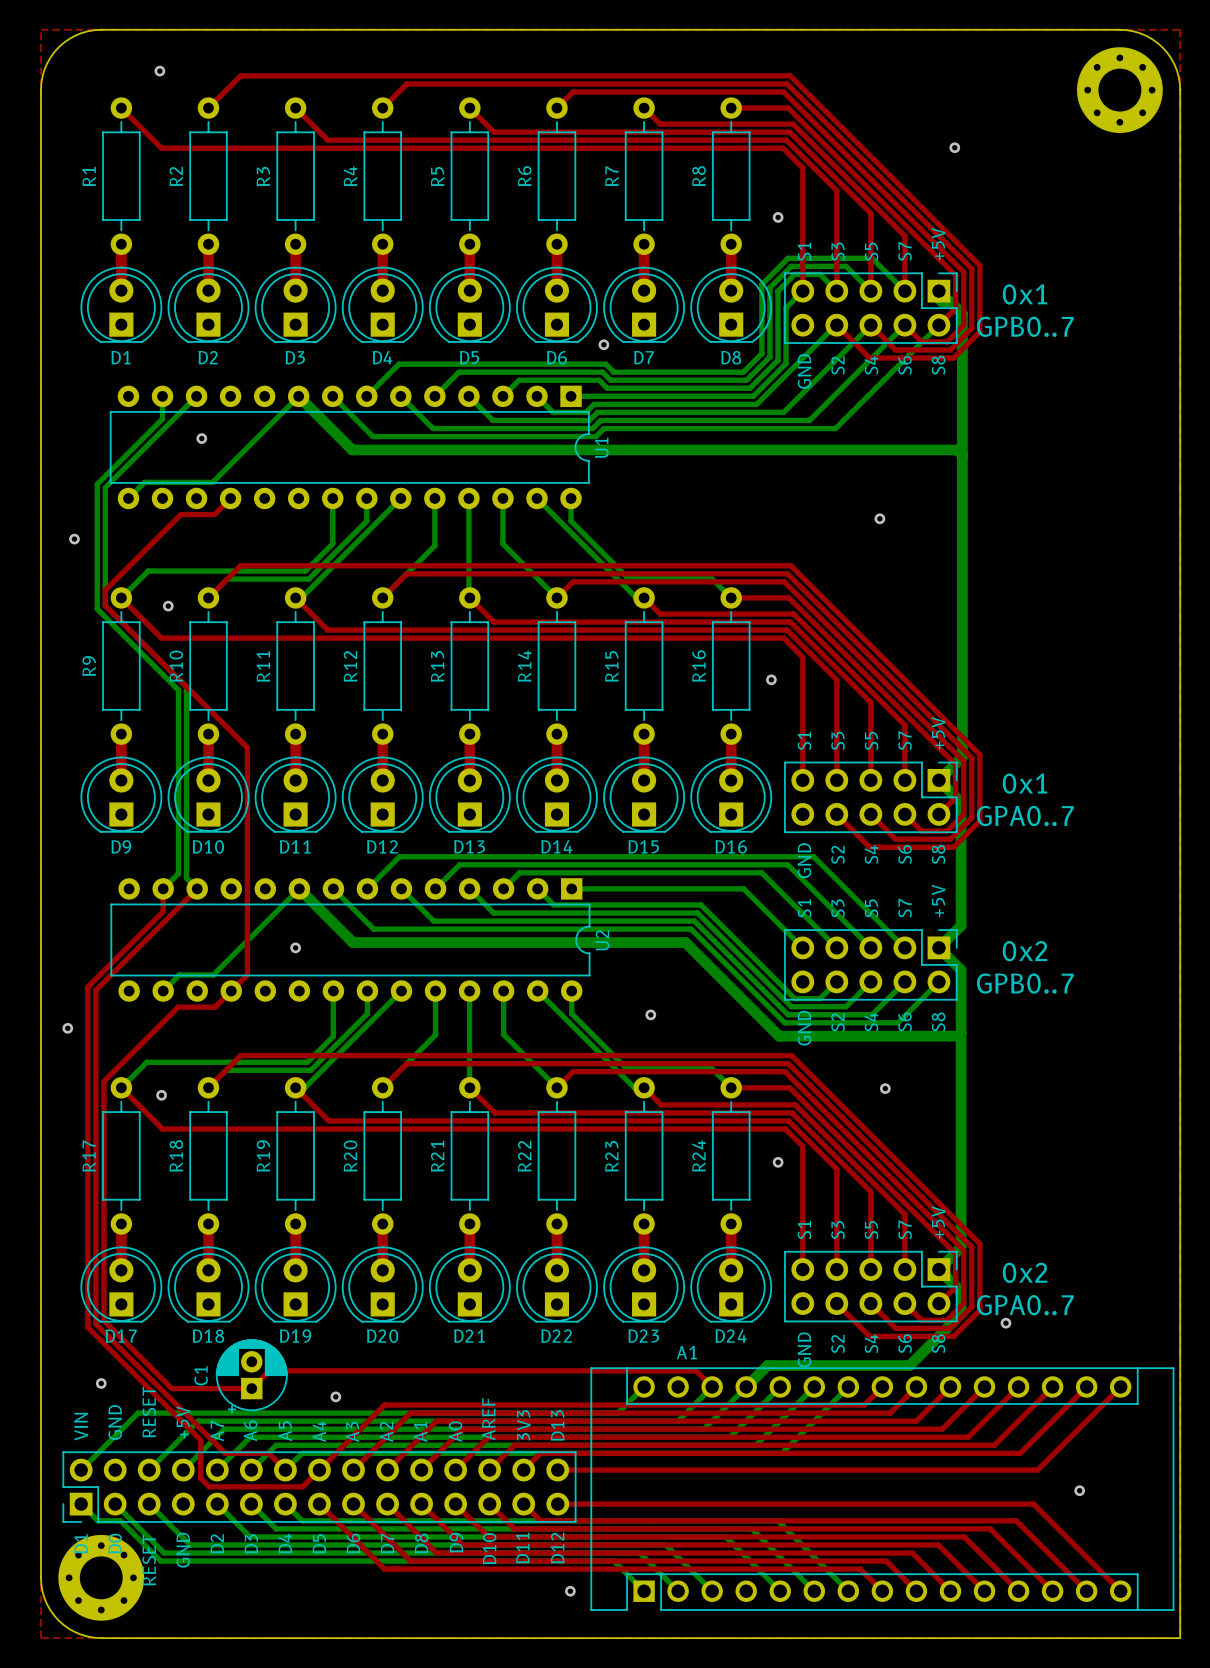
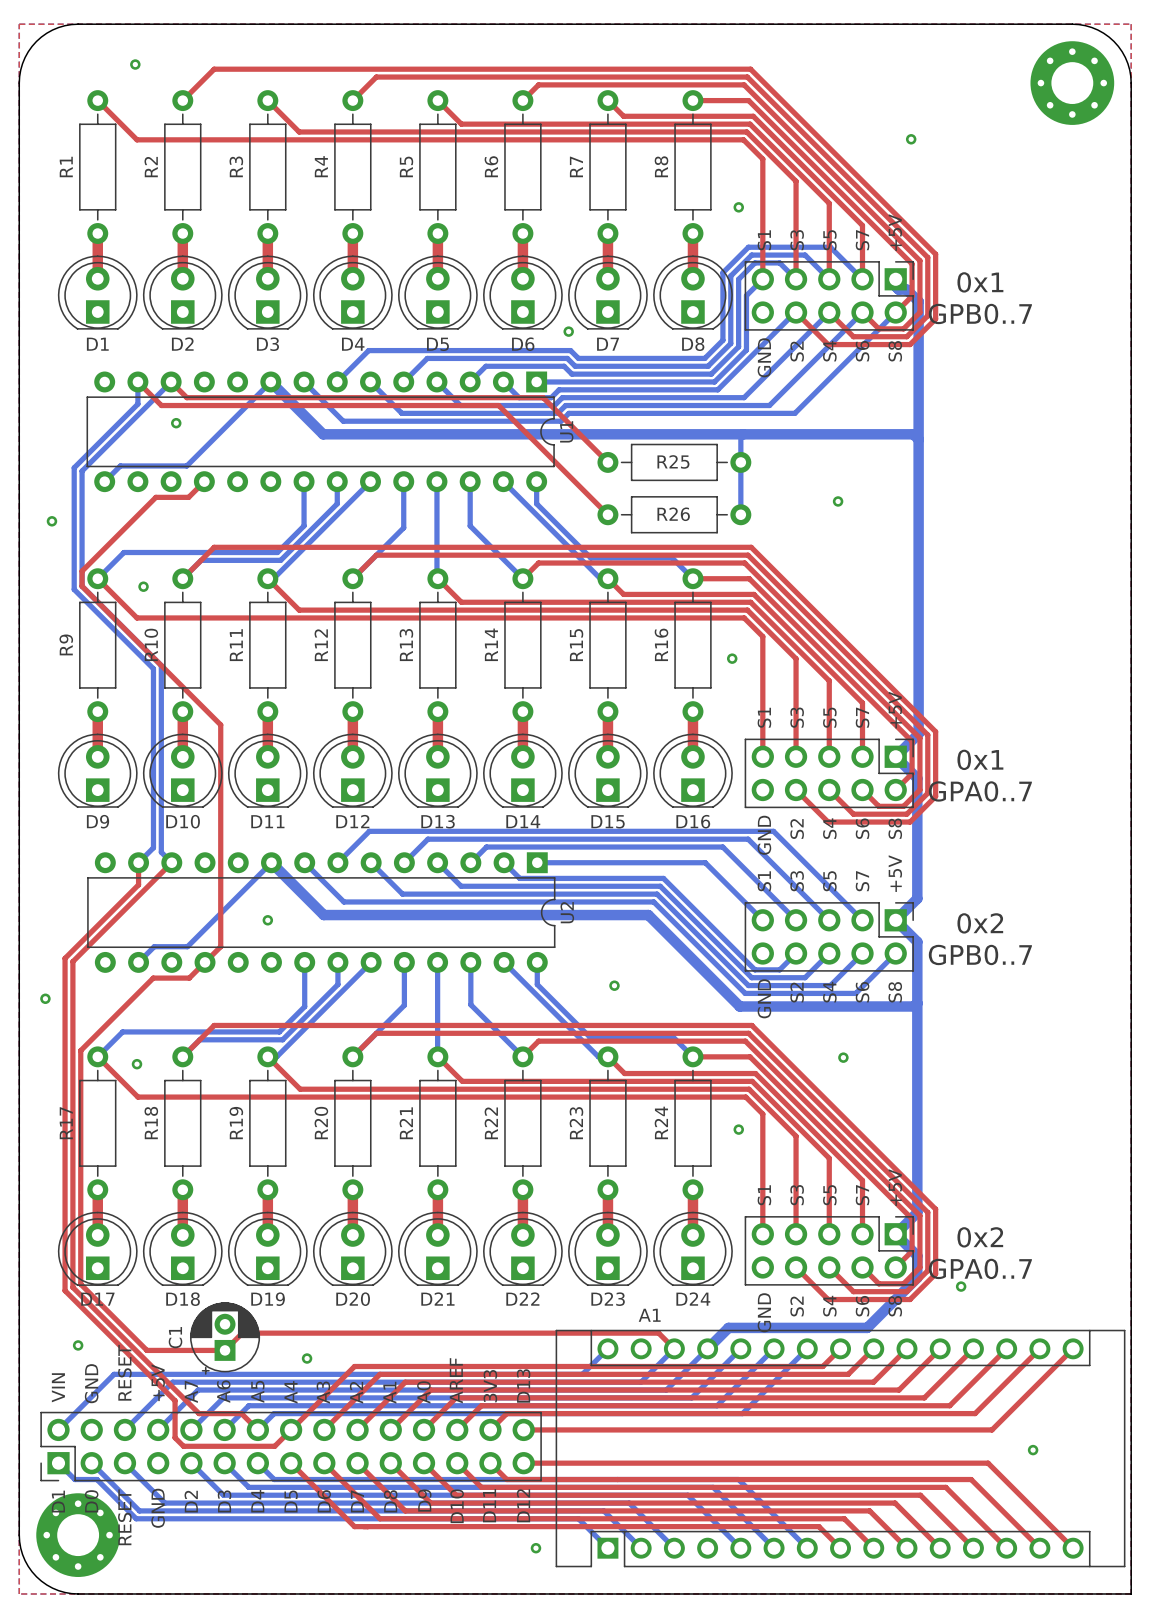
top track: none -> (137, 381) (161, 405) (498, 405) (607, 514)
top track: none -> (171, 381) (186, 397) (543, 397) (607, 462)
bottom track: none -> (743, 434) (740, 436) (740, 514)
R25: none -> (674, 462)
R26: none -> (674, 514)

